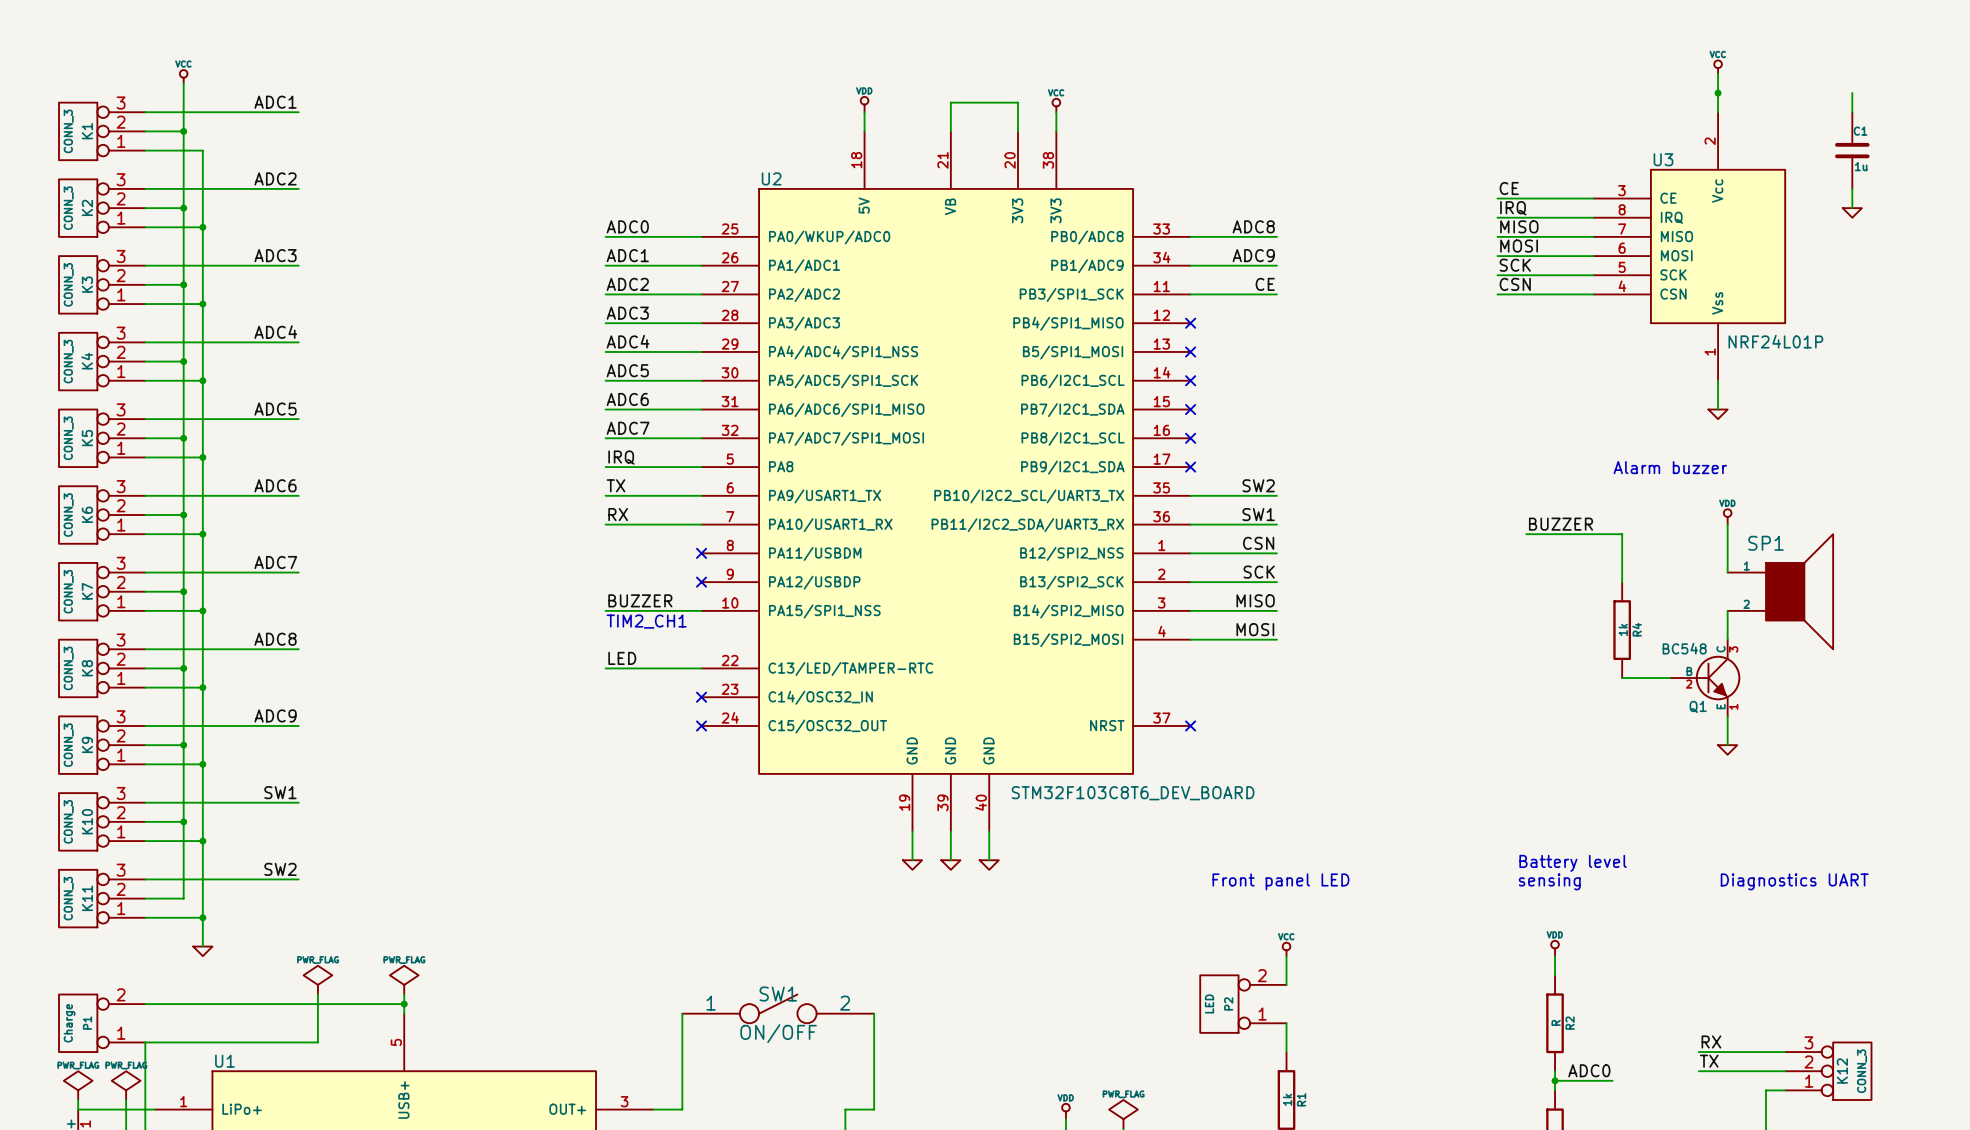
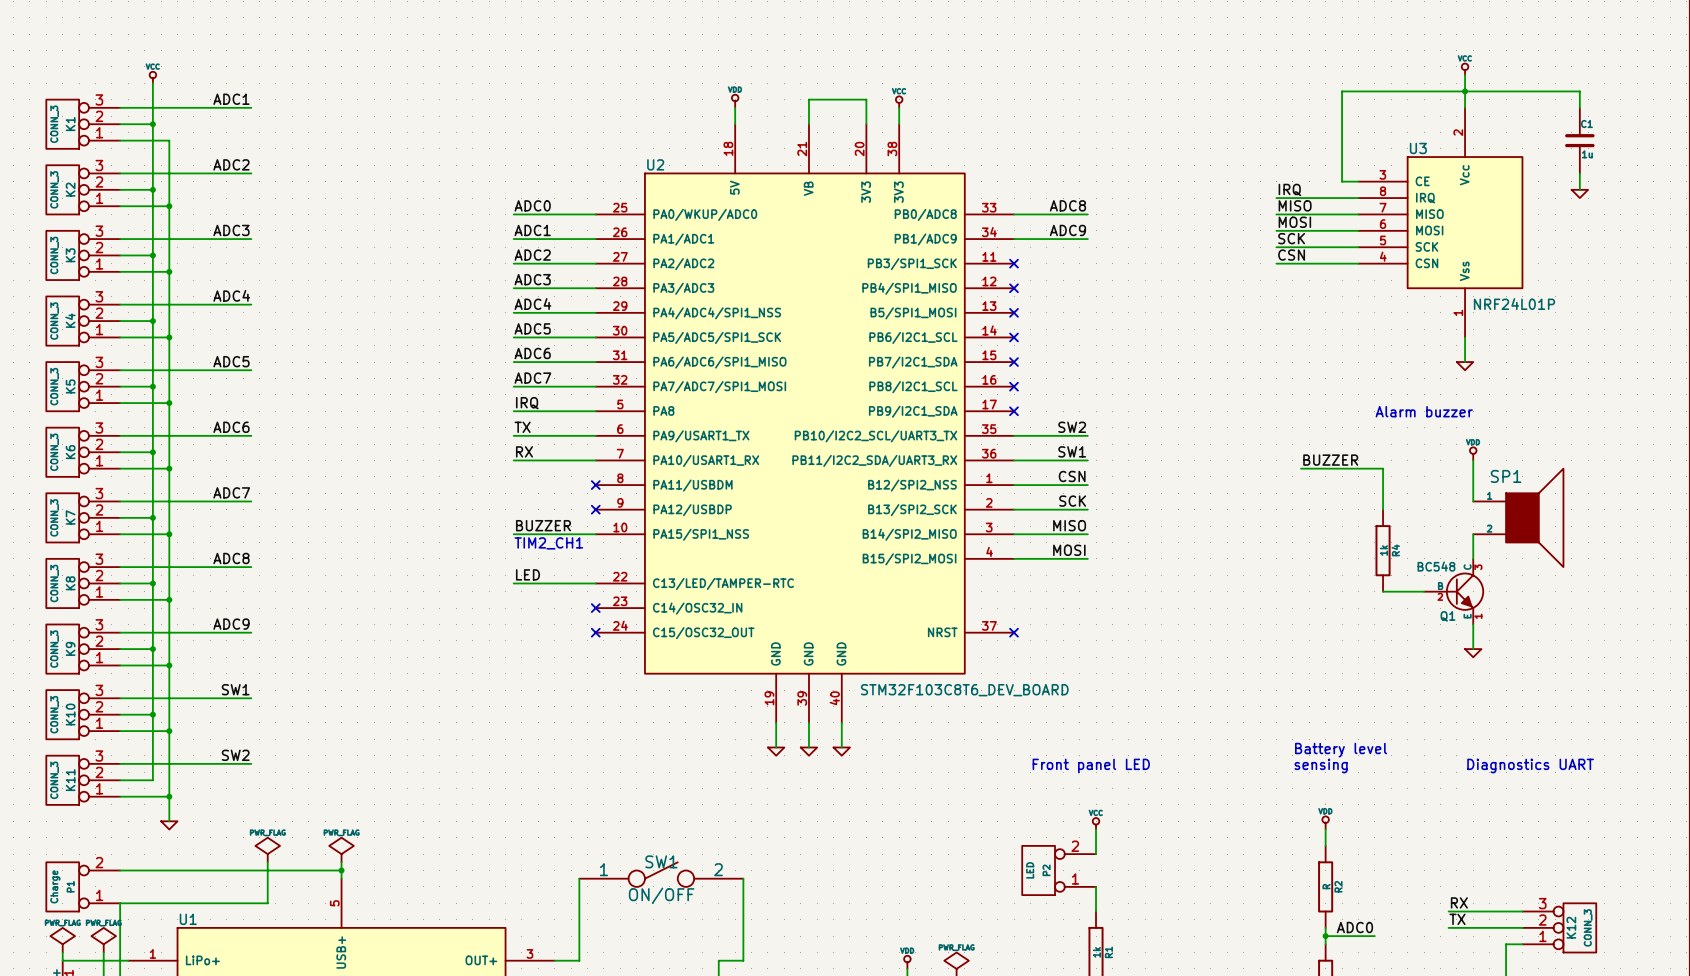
label: CE (1509, 188) -> none
wire: (1497, 198) (1574, 198) -> (1579, 91) (1342, 91) (1342, 181)
label: CE (1265, 284) -> none
wire: (1190, 294) (1276, 294) -> none
no-connect mark: none -> (1014, 263)

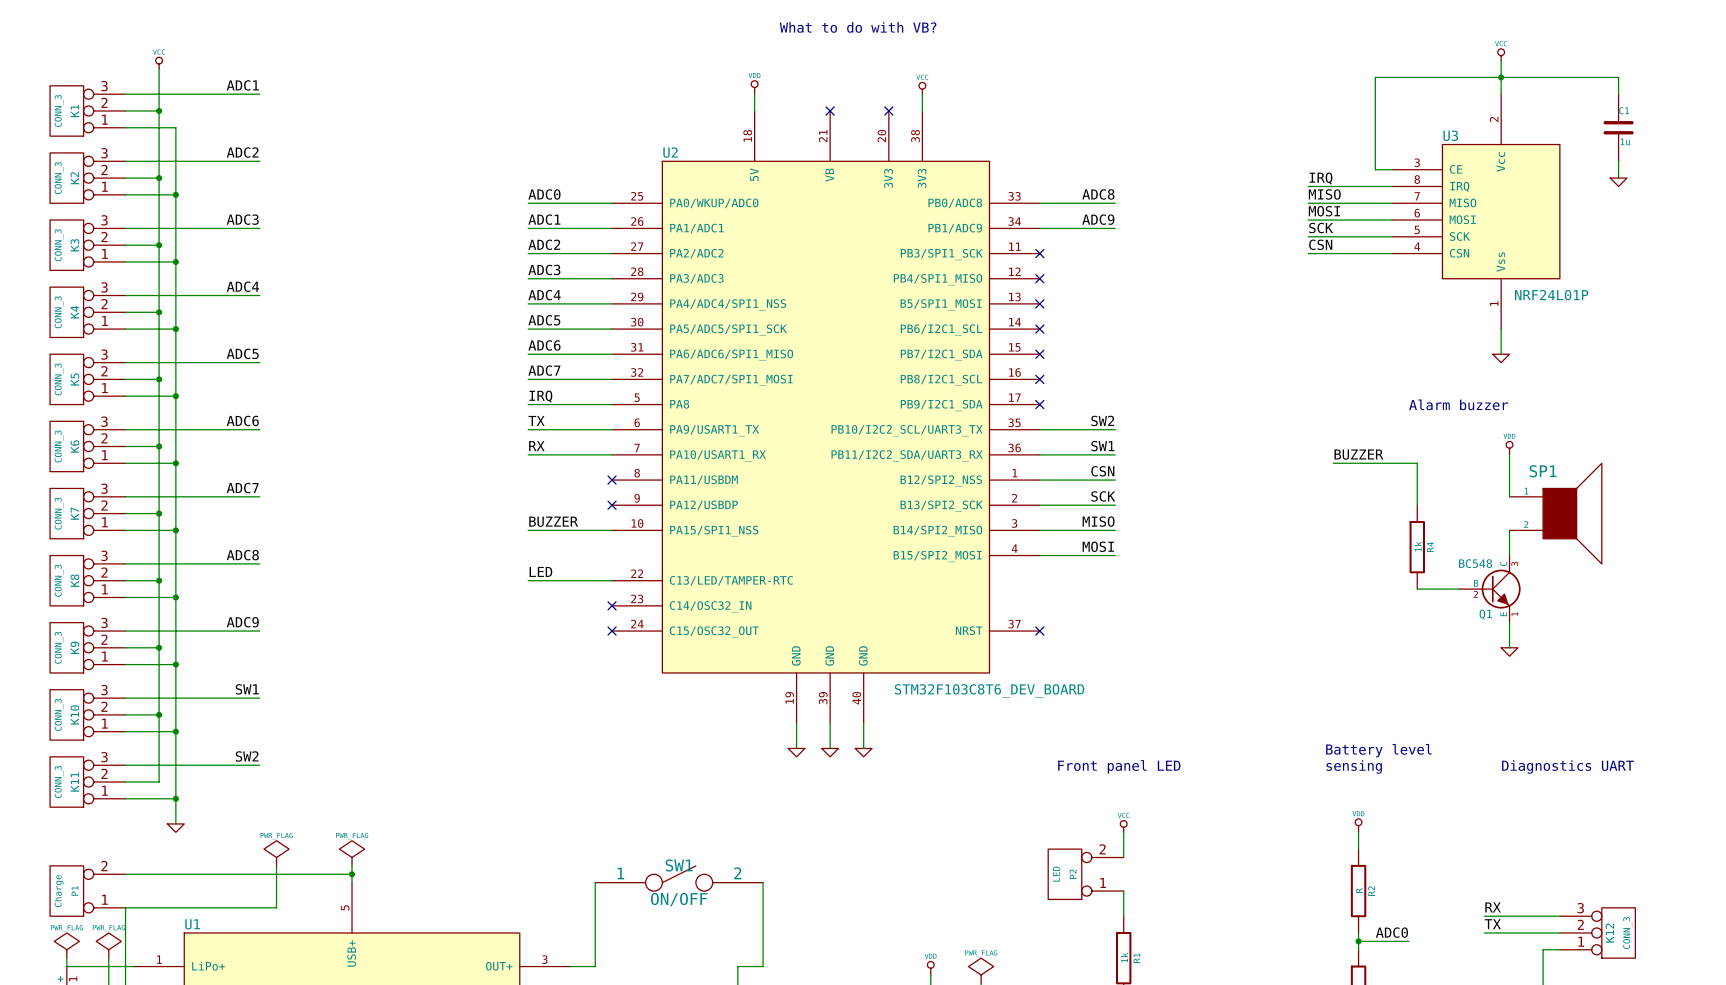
text: none -> What to do with VB? (858, 27)
wire: (808, 124) (808, 99) (866, 99) (866, 124) -> none
no-connect mark: none -> (830, 110)
no-connect mark: none -> (888, 110)
text: TIM2_CH1 (548, 543) -> none

